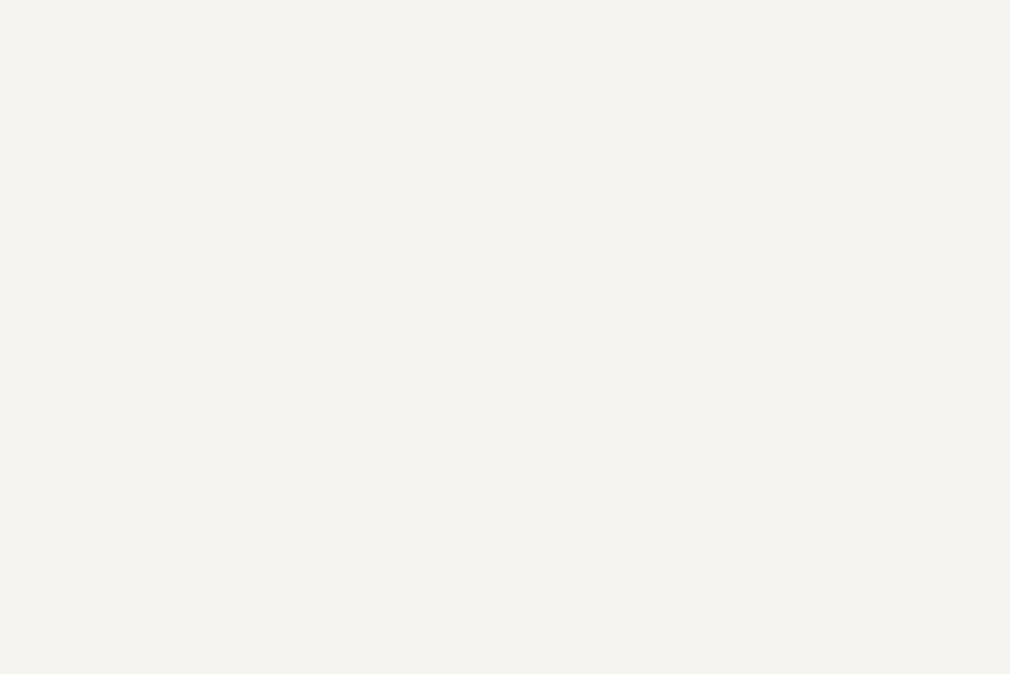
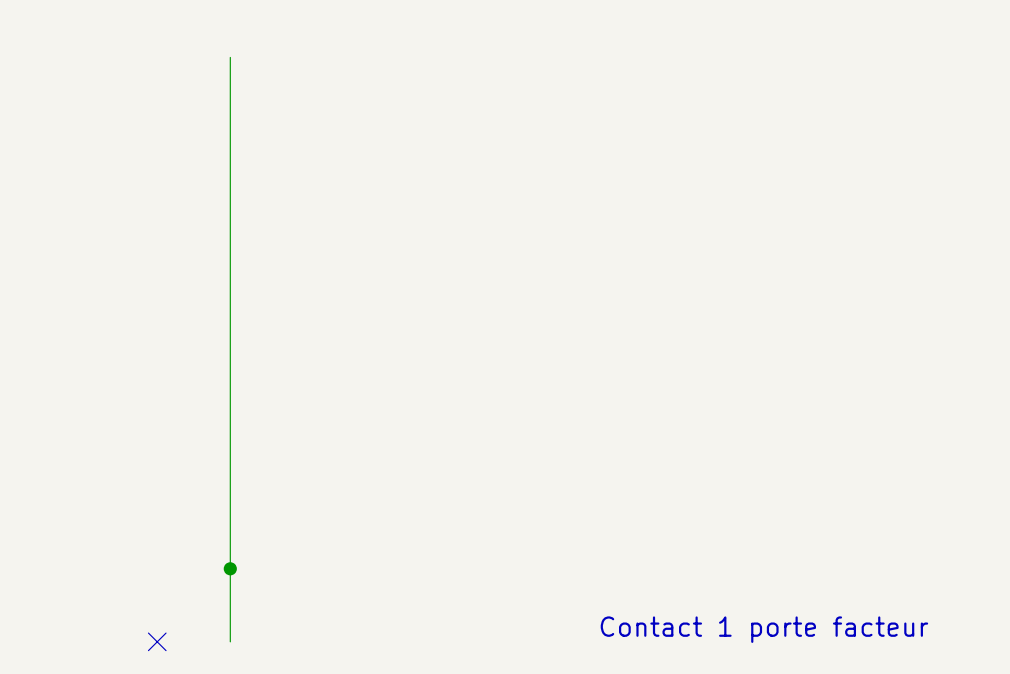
wire: none -> (230, 57) (230, 641)
junction: none -> (230, 568)
text: none -> Contact 1 porte facteur (764, 629)
no-connect mark: none -> (157, 641)

